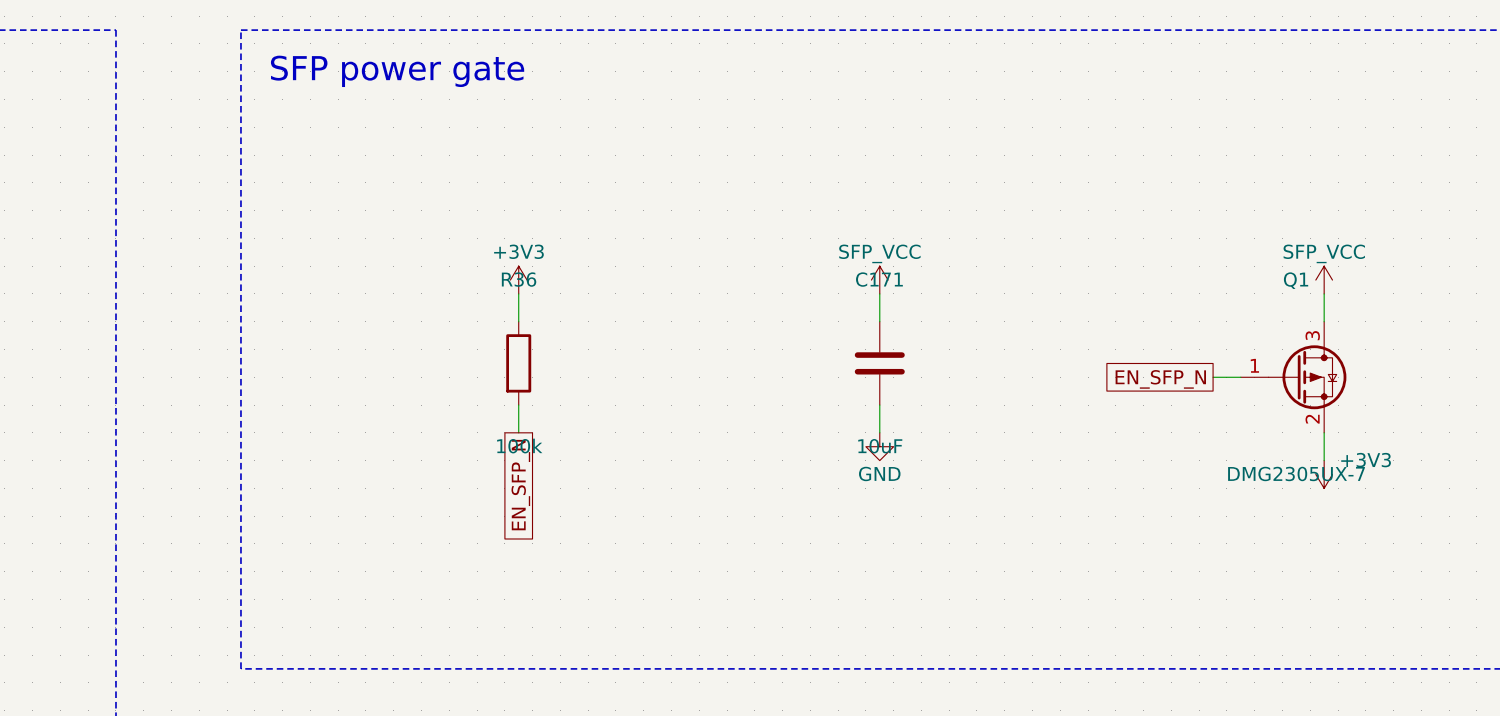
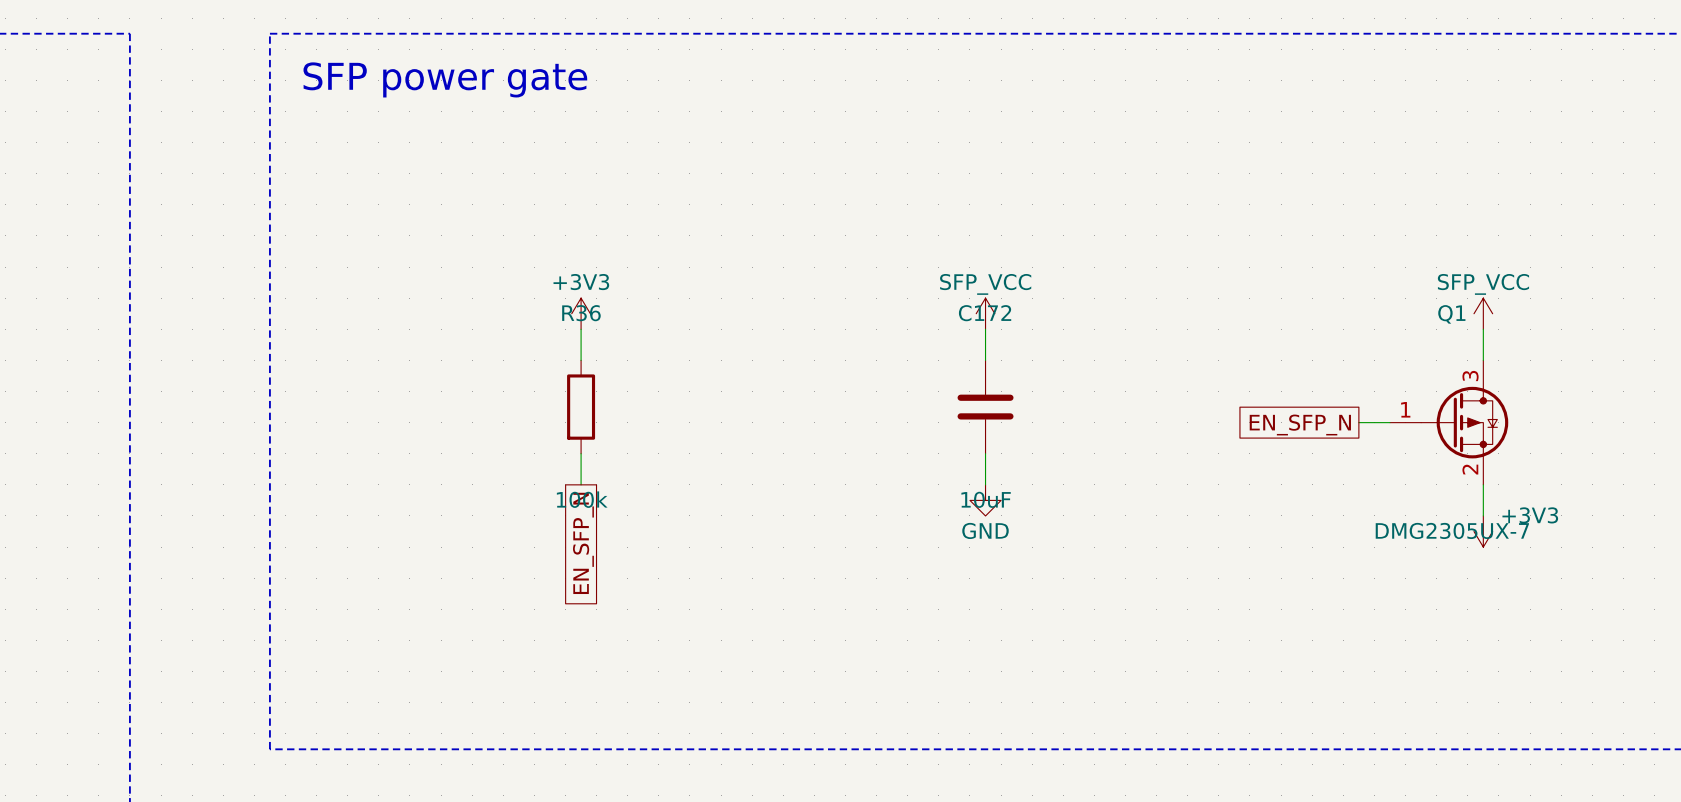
C171 name: C171 (879, 279) -> C172 (985, 313)

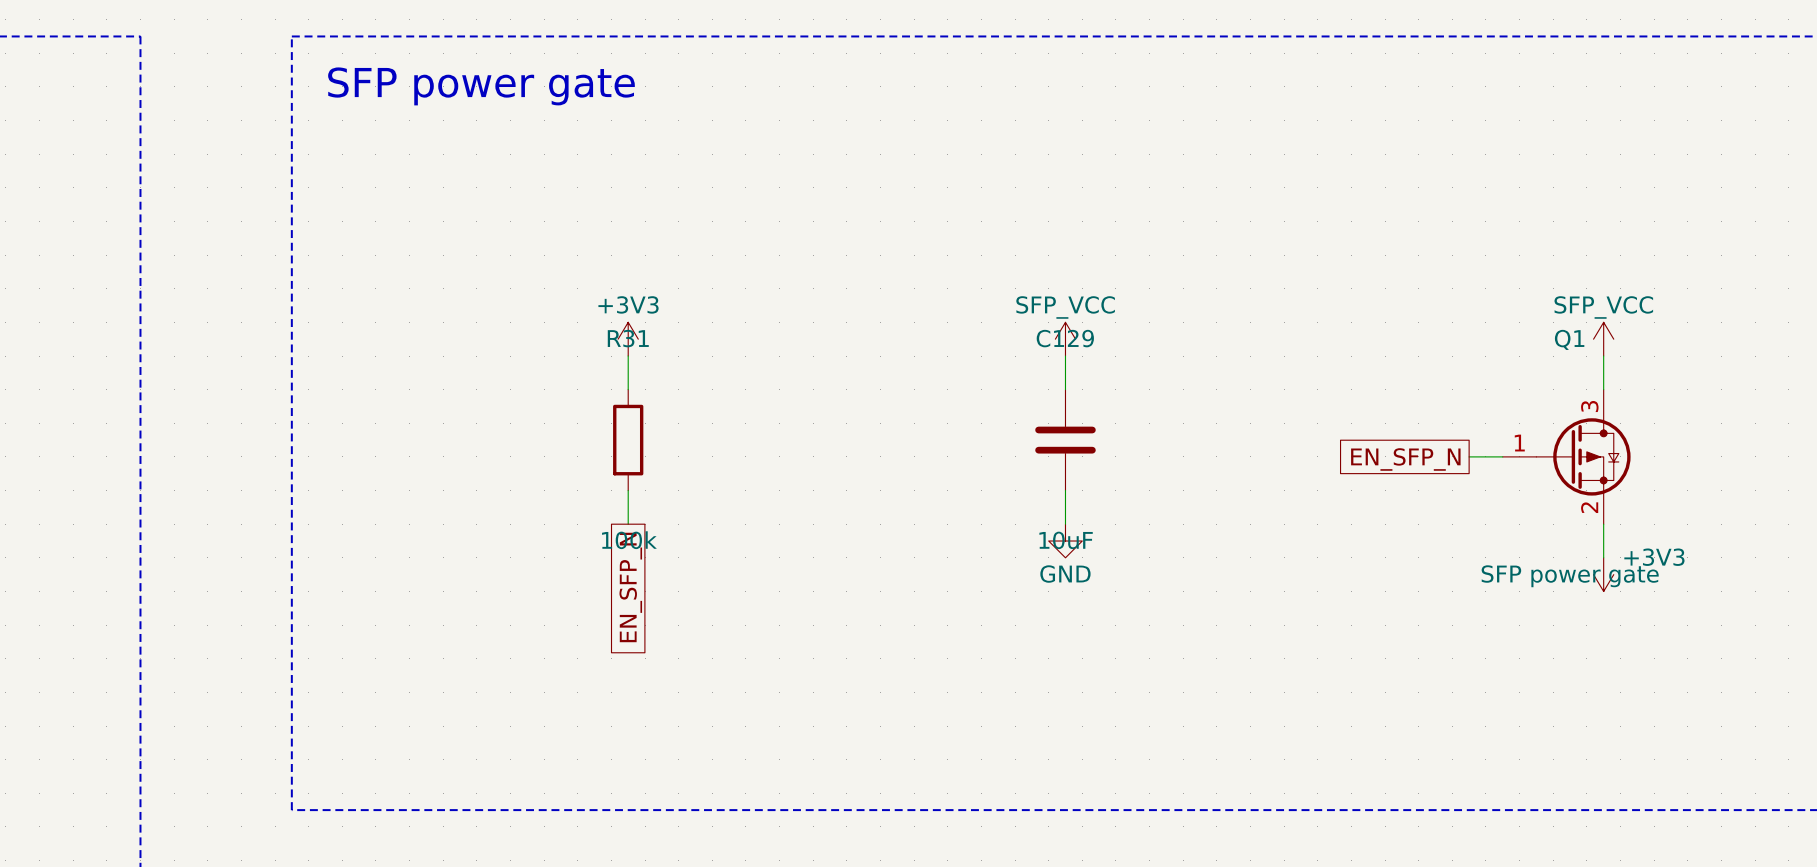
R36 name: R36 (581, 313) -> R31 (628, 338)
C172 name: C172 (985, 313) -> C129 (1065, 338)
Q1 value: DMG2305UX-7 (1452, 530) -> SFP power gate (1570, 576)

